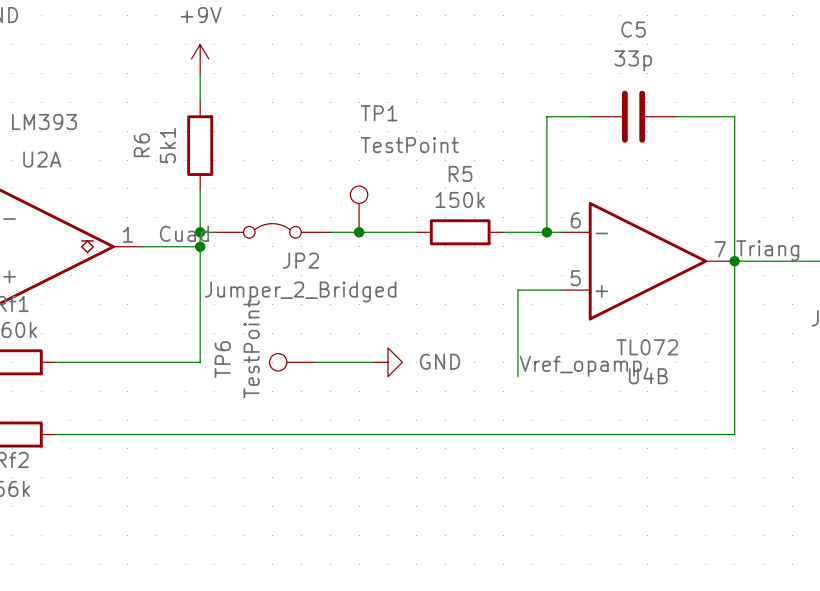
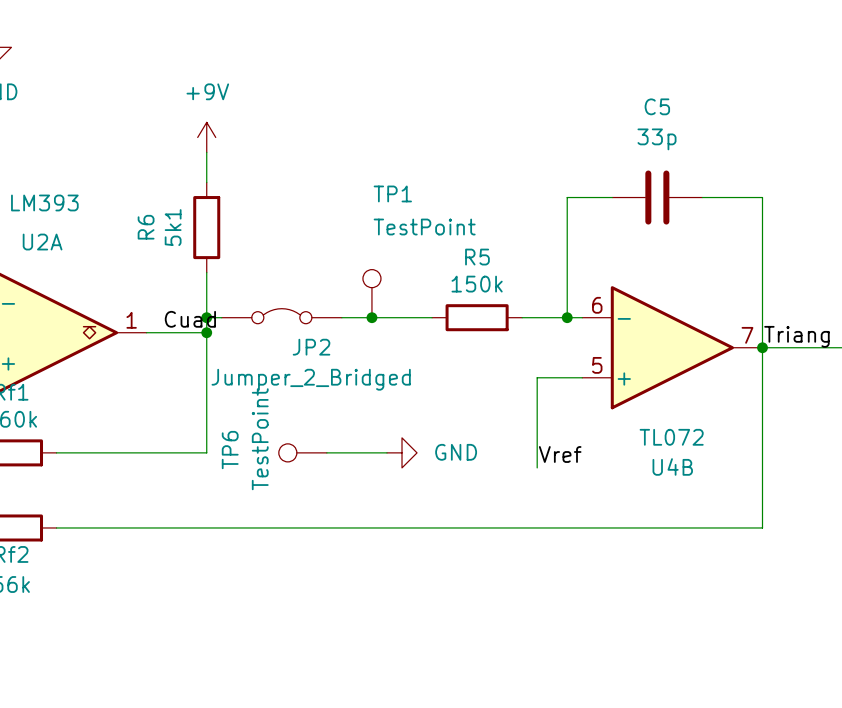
label: Vref_opamp (580, 366) -> Vref (560, 454)

